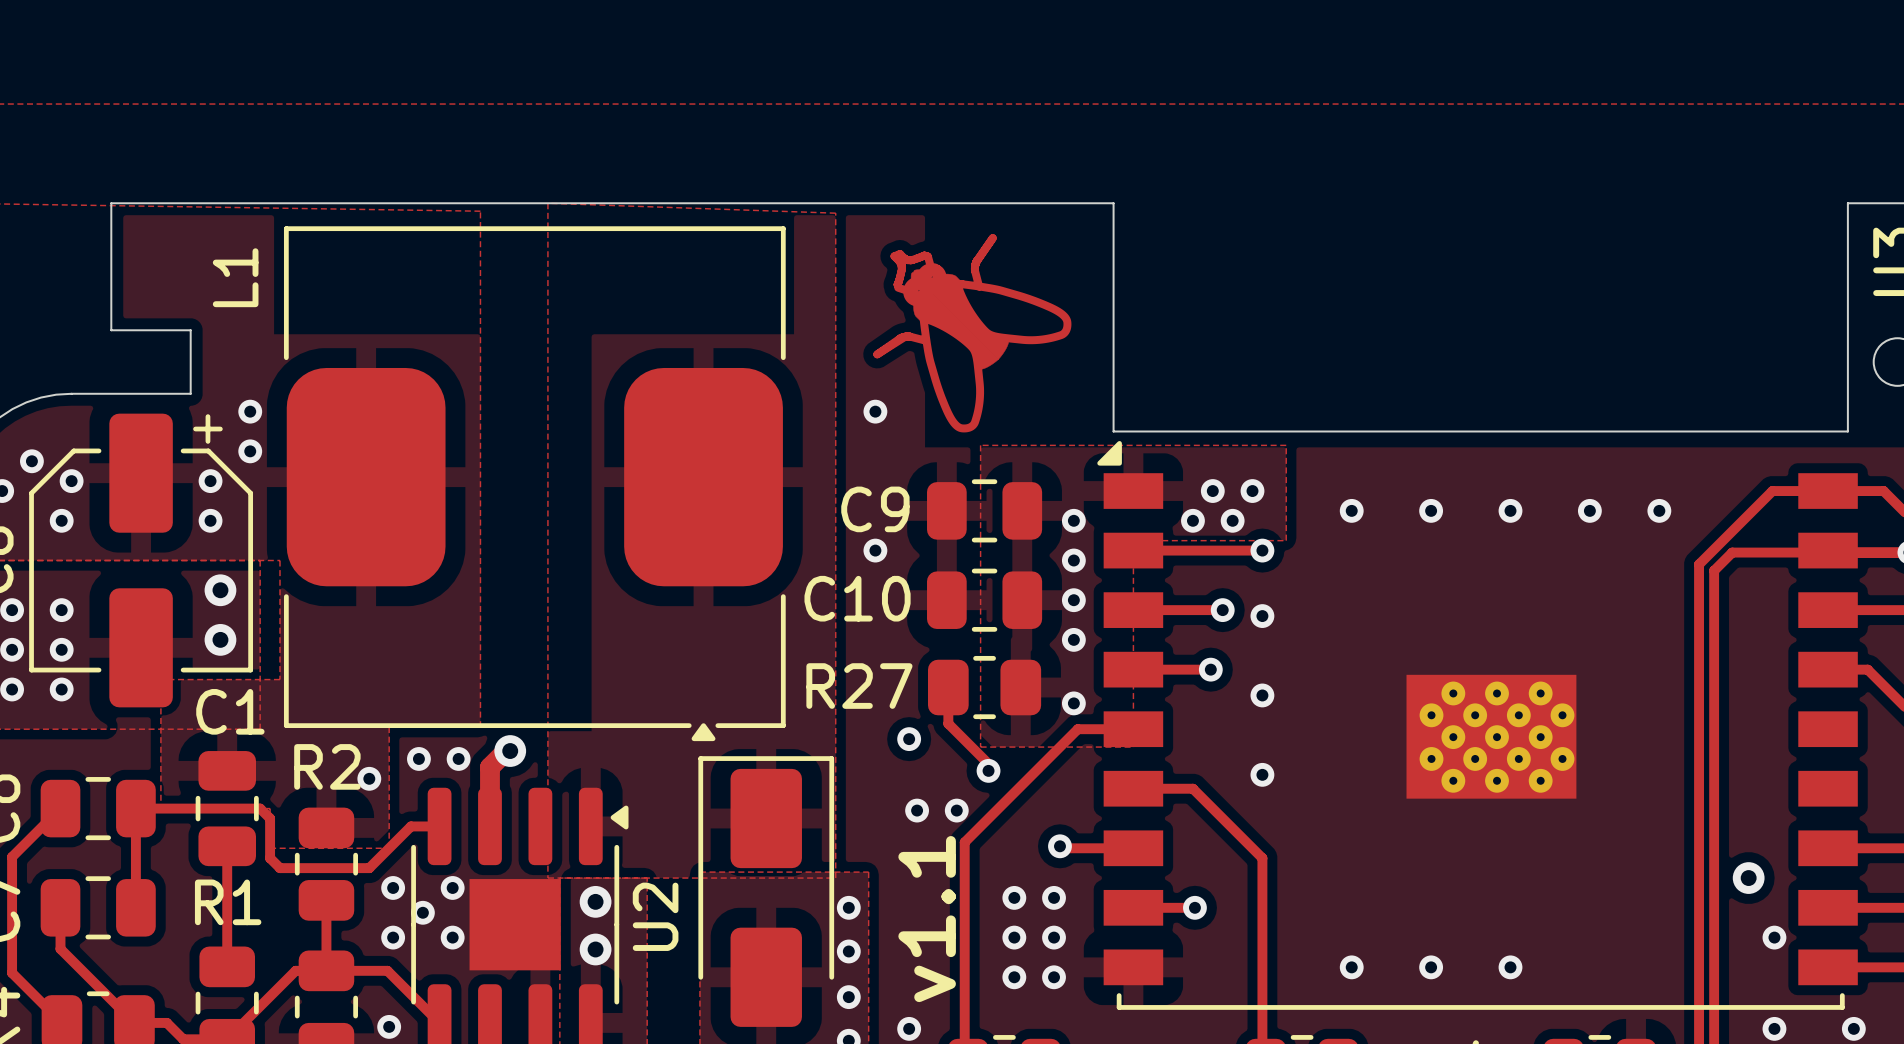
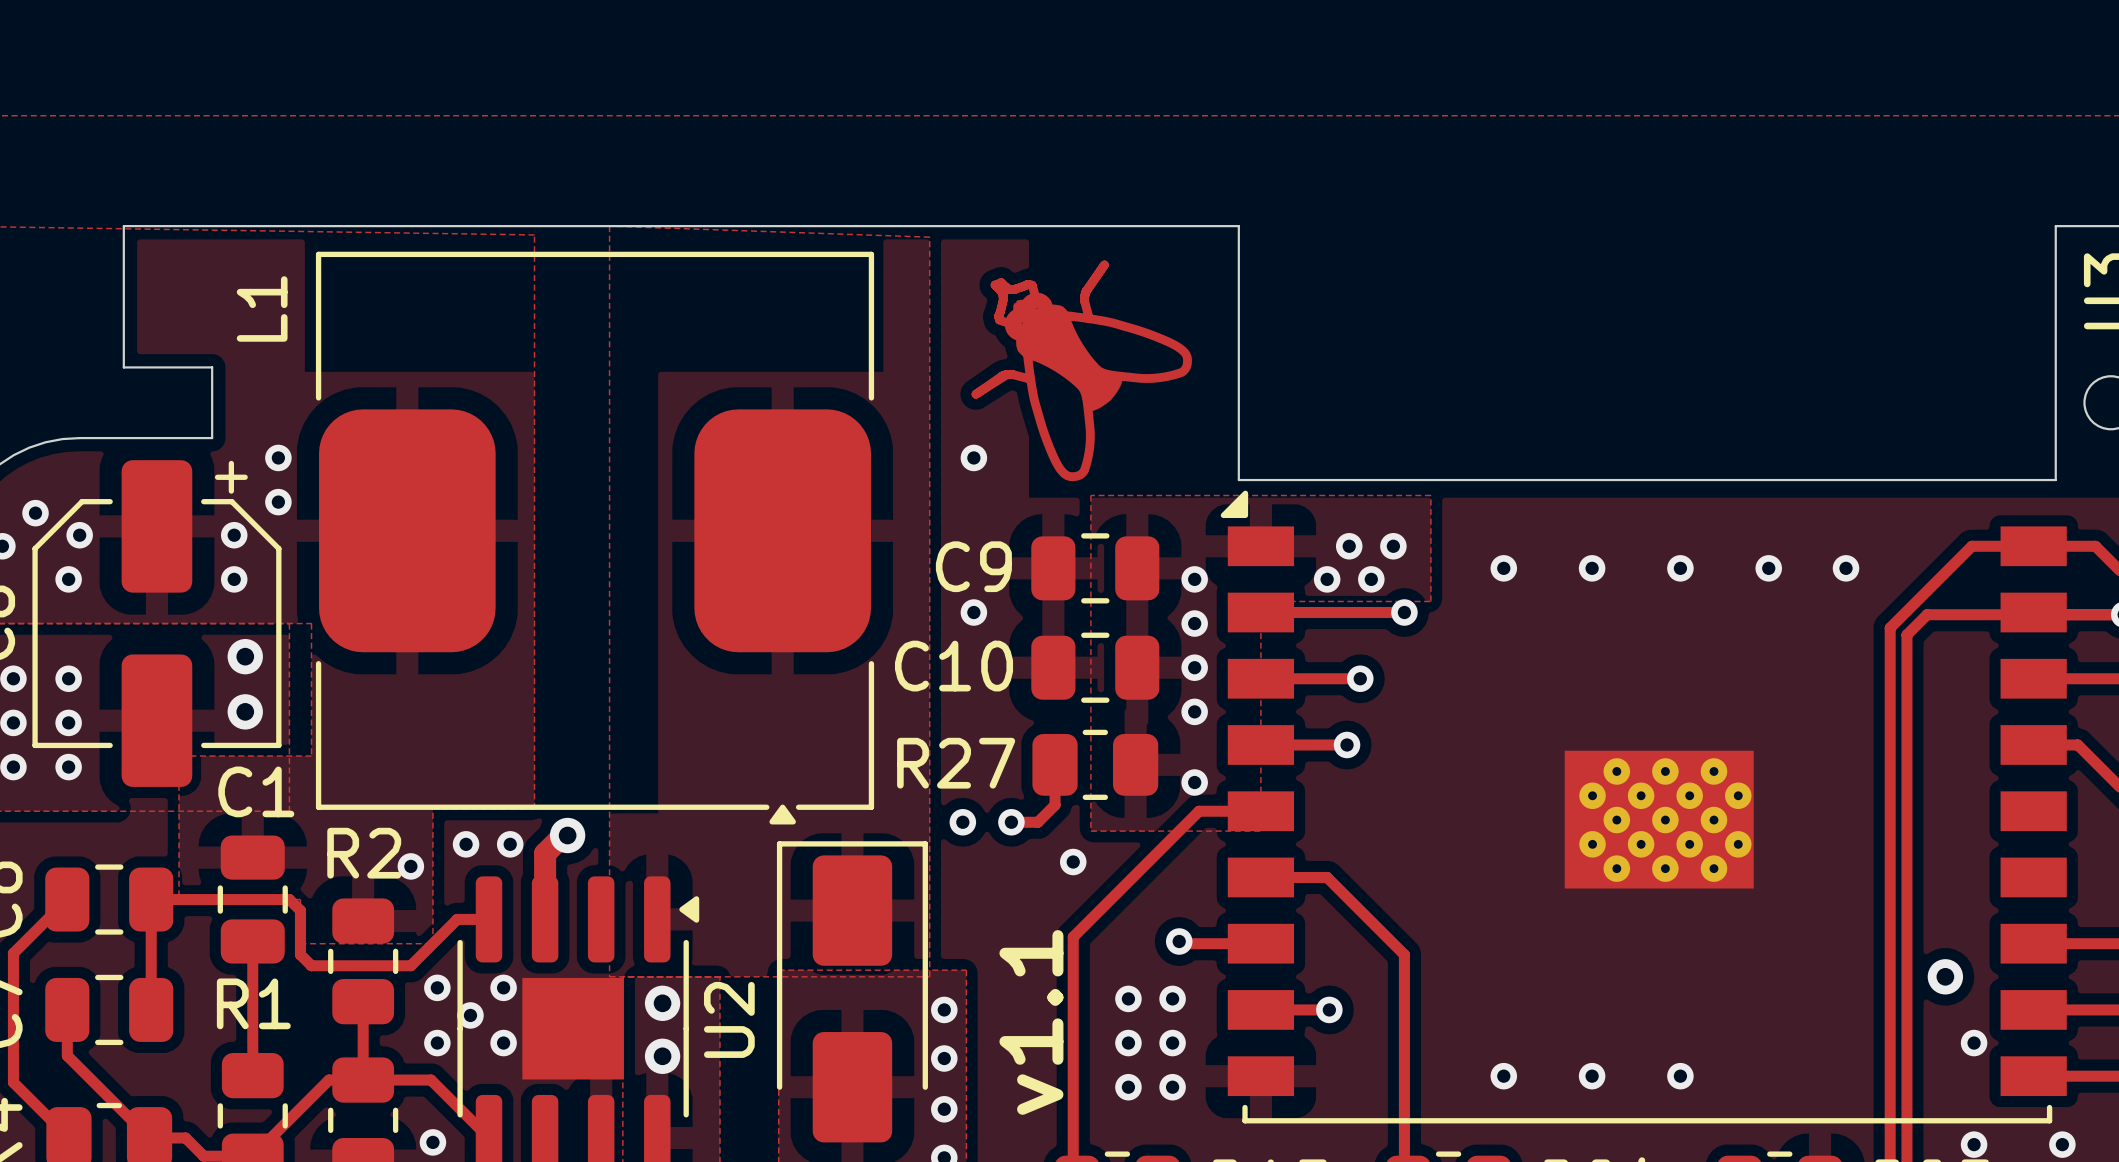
via: (1262, 616) -> none
via: (1262, 695) -> none
track: (948, 723) (988, 763) (988, 770) -> (1055, 805) (1037, 822) (1011, 822)
via: none -> (962, 822)
via: (988, 770) -> none
via: none -> (1073, 862)
via: (1262, 774) -> none
via: (917, 810) -> none
via: (956, 810) -> none
via: (909, 1028) -> none

